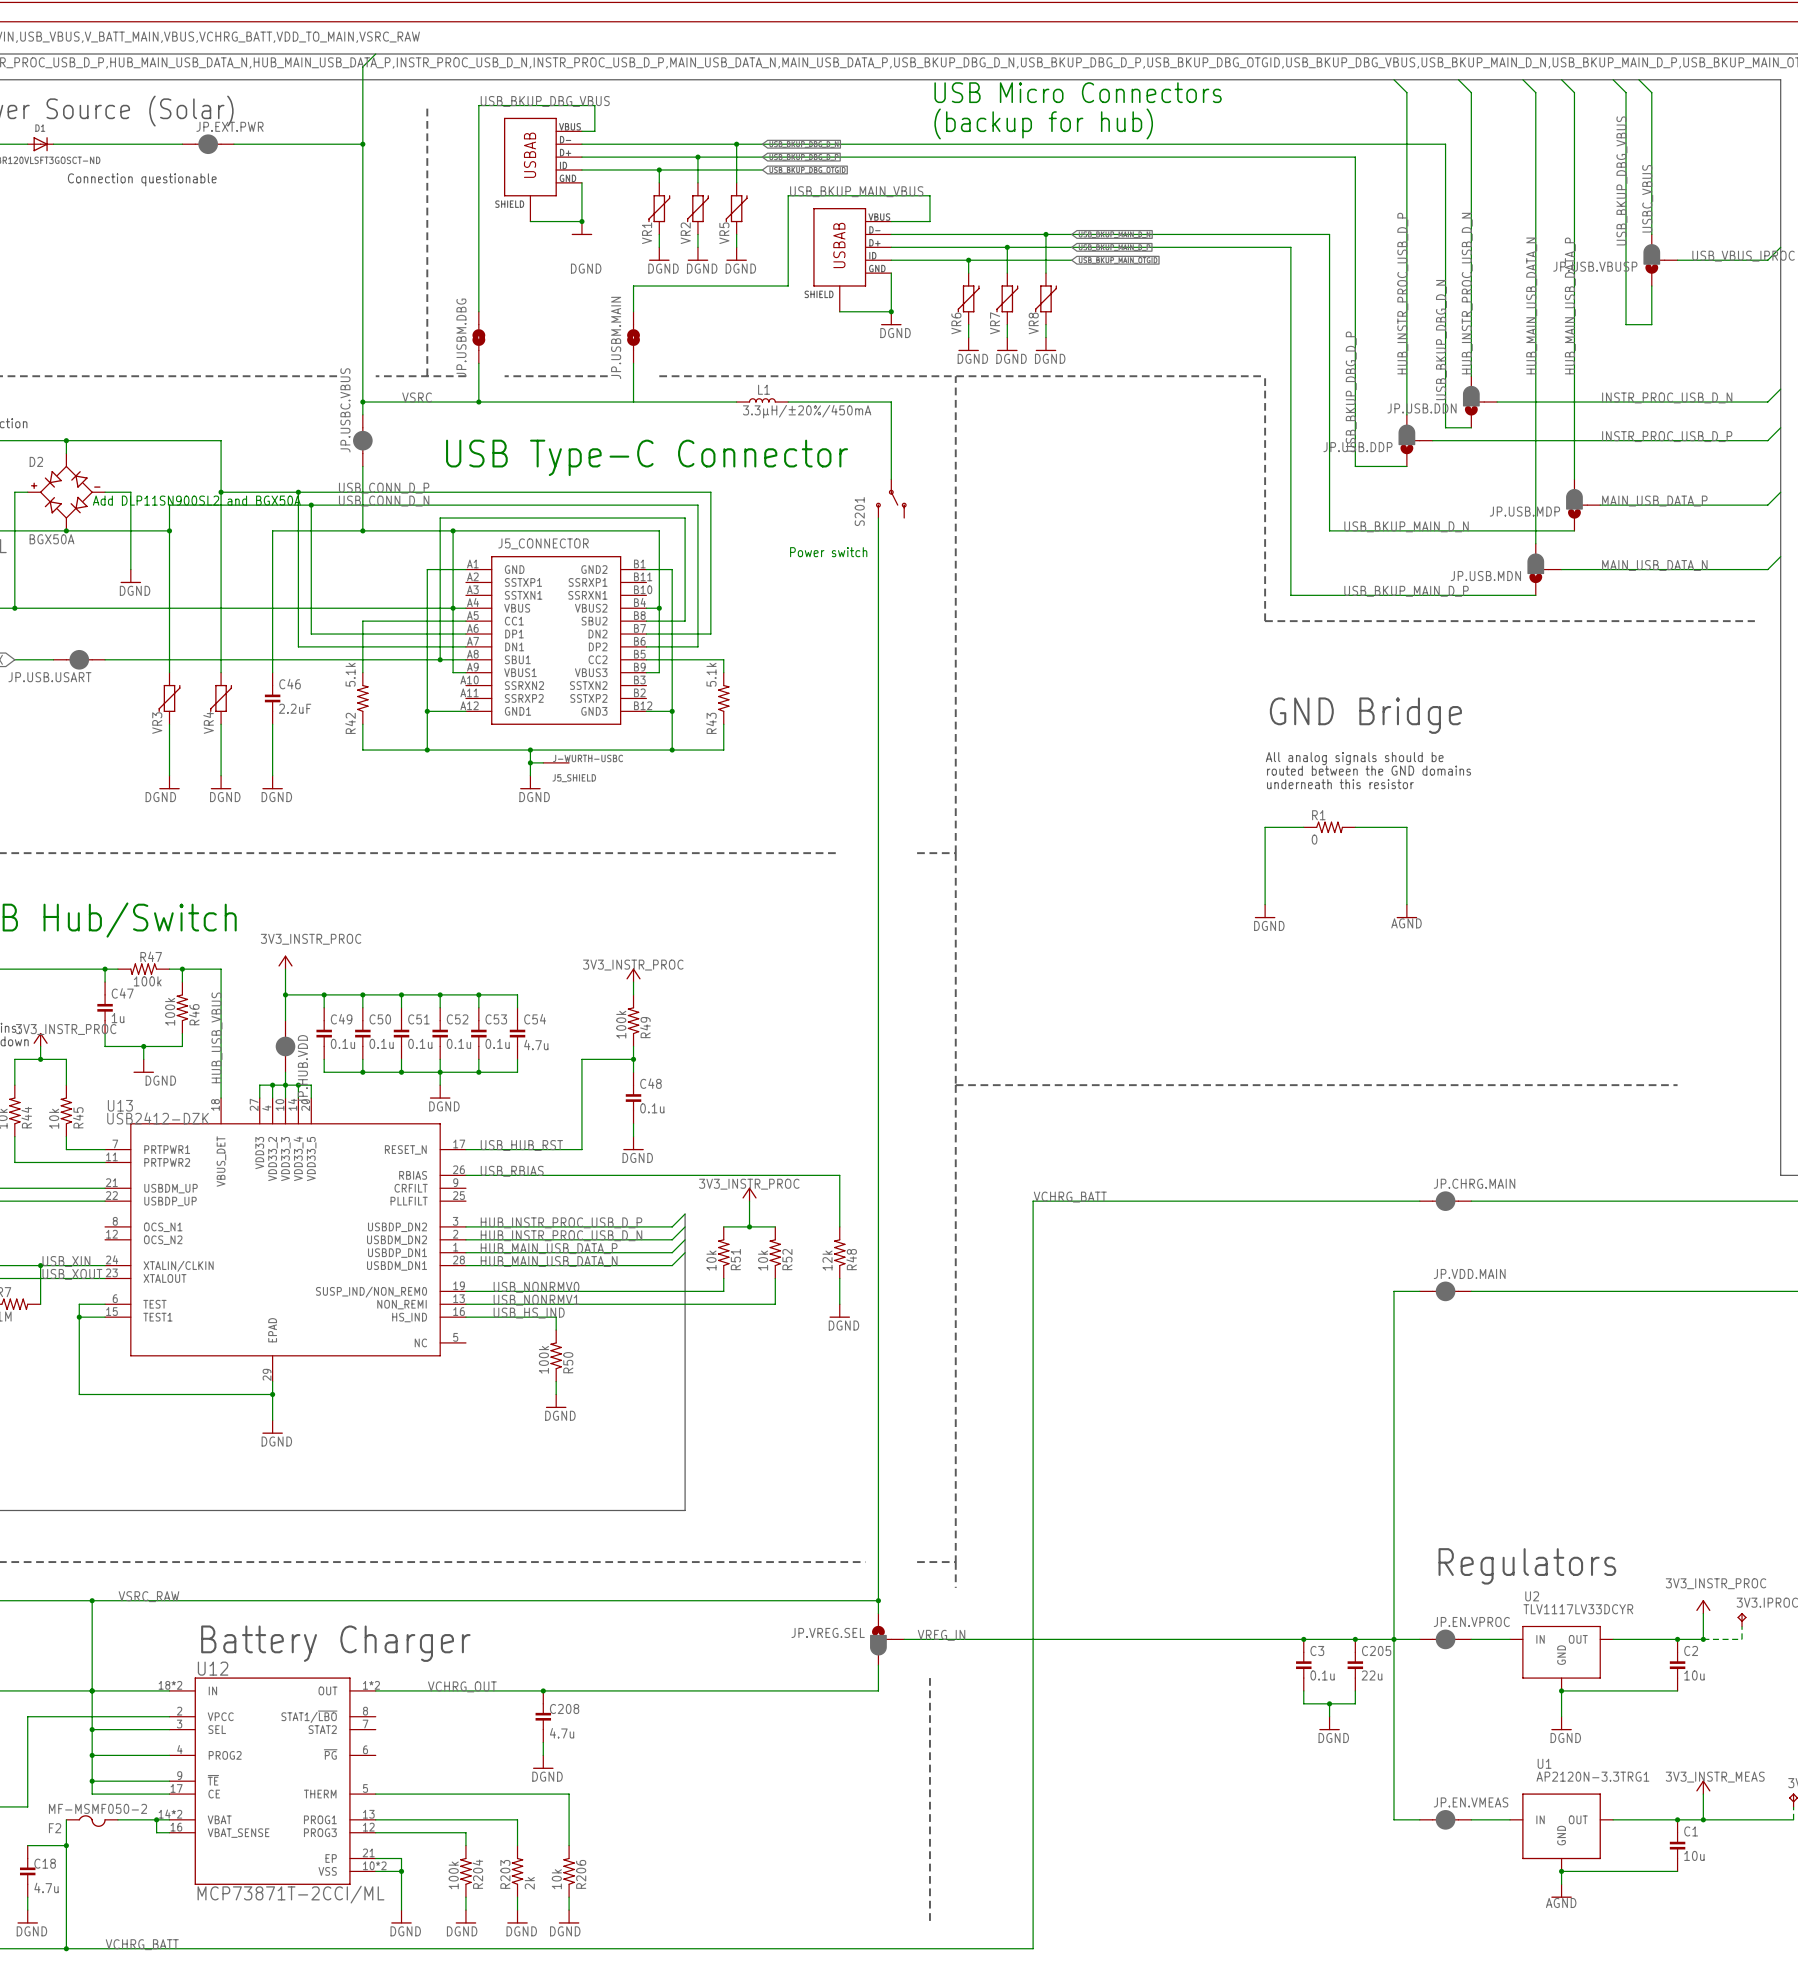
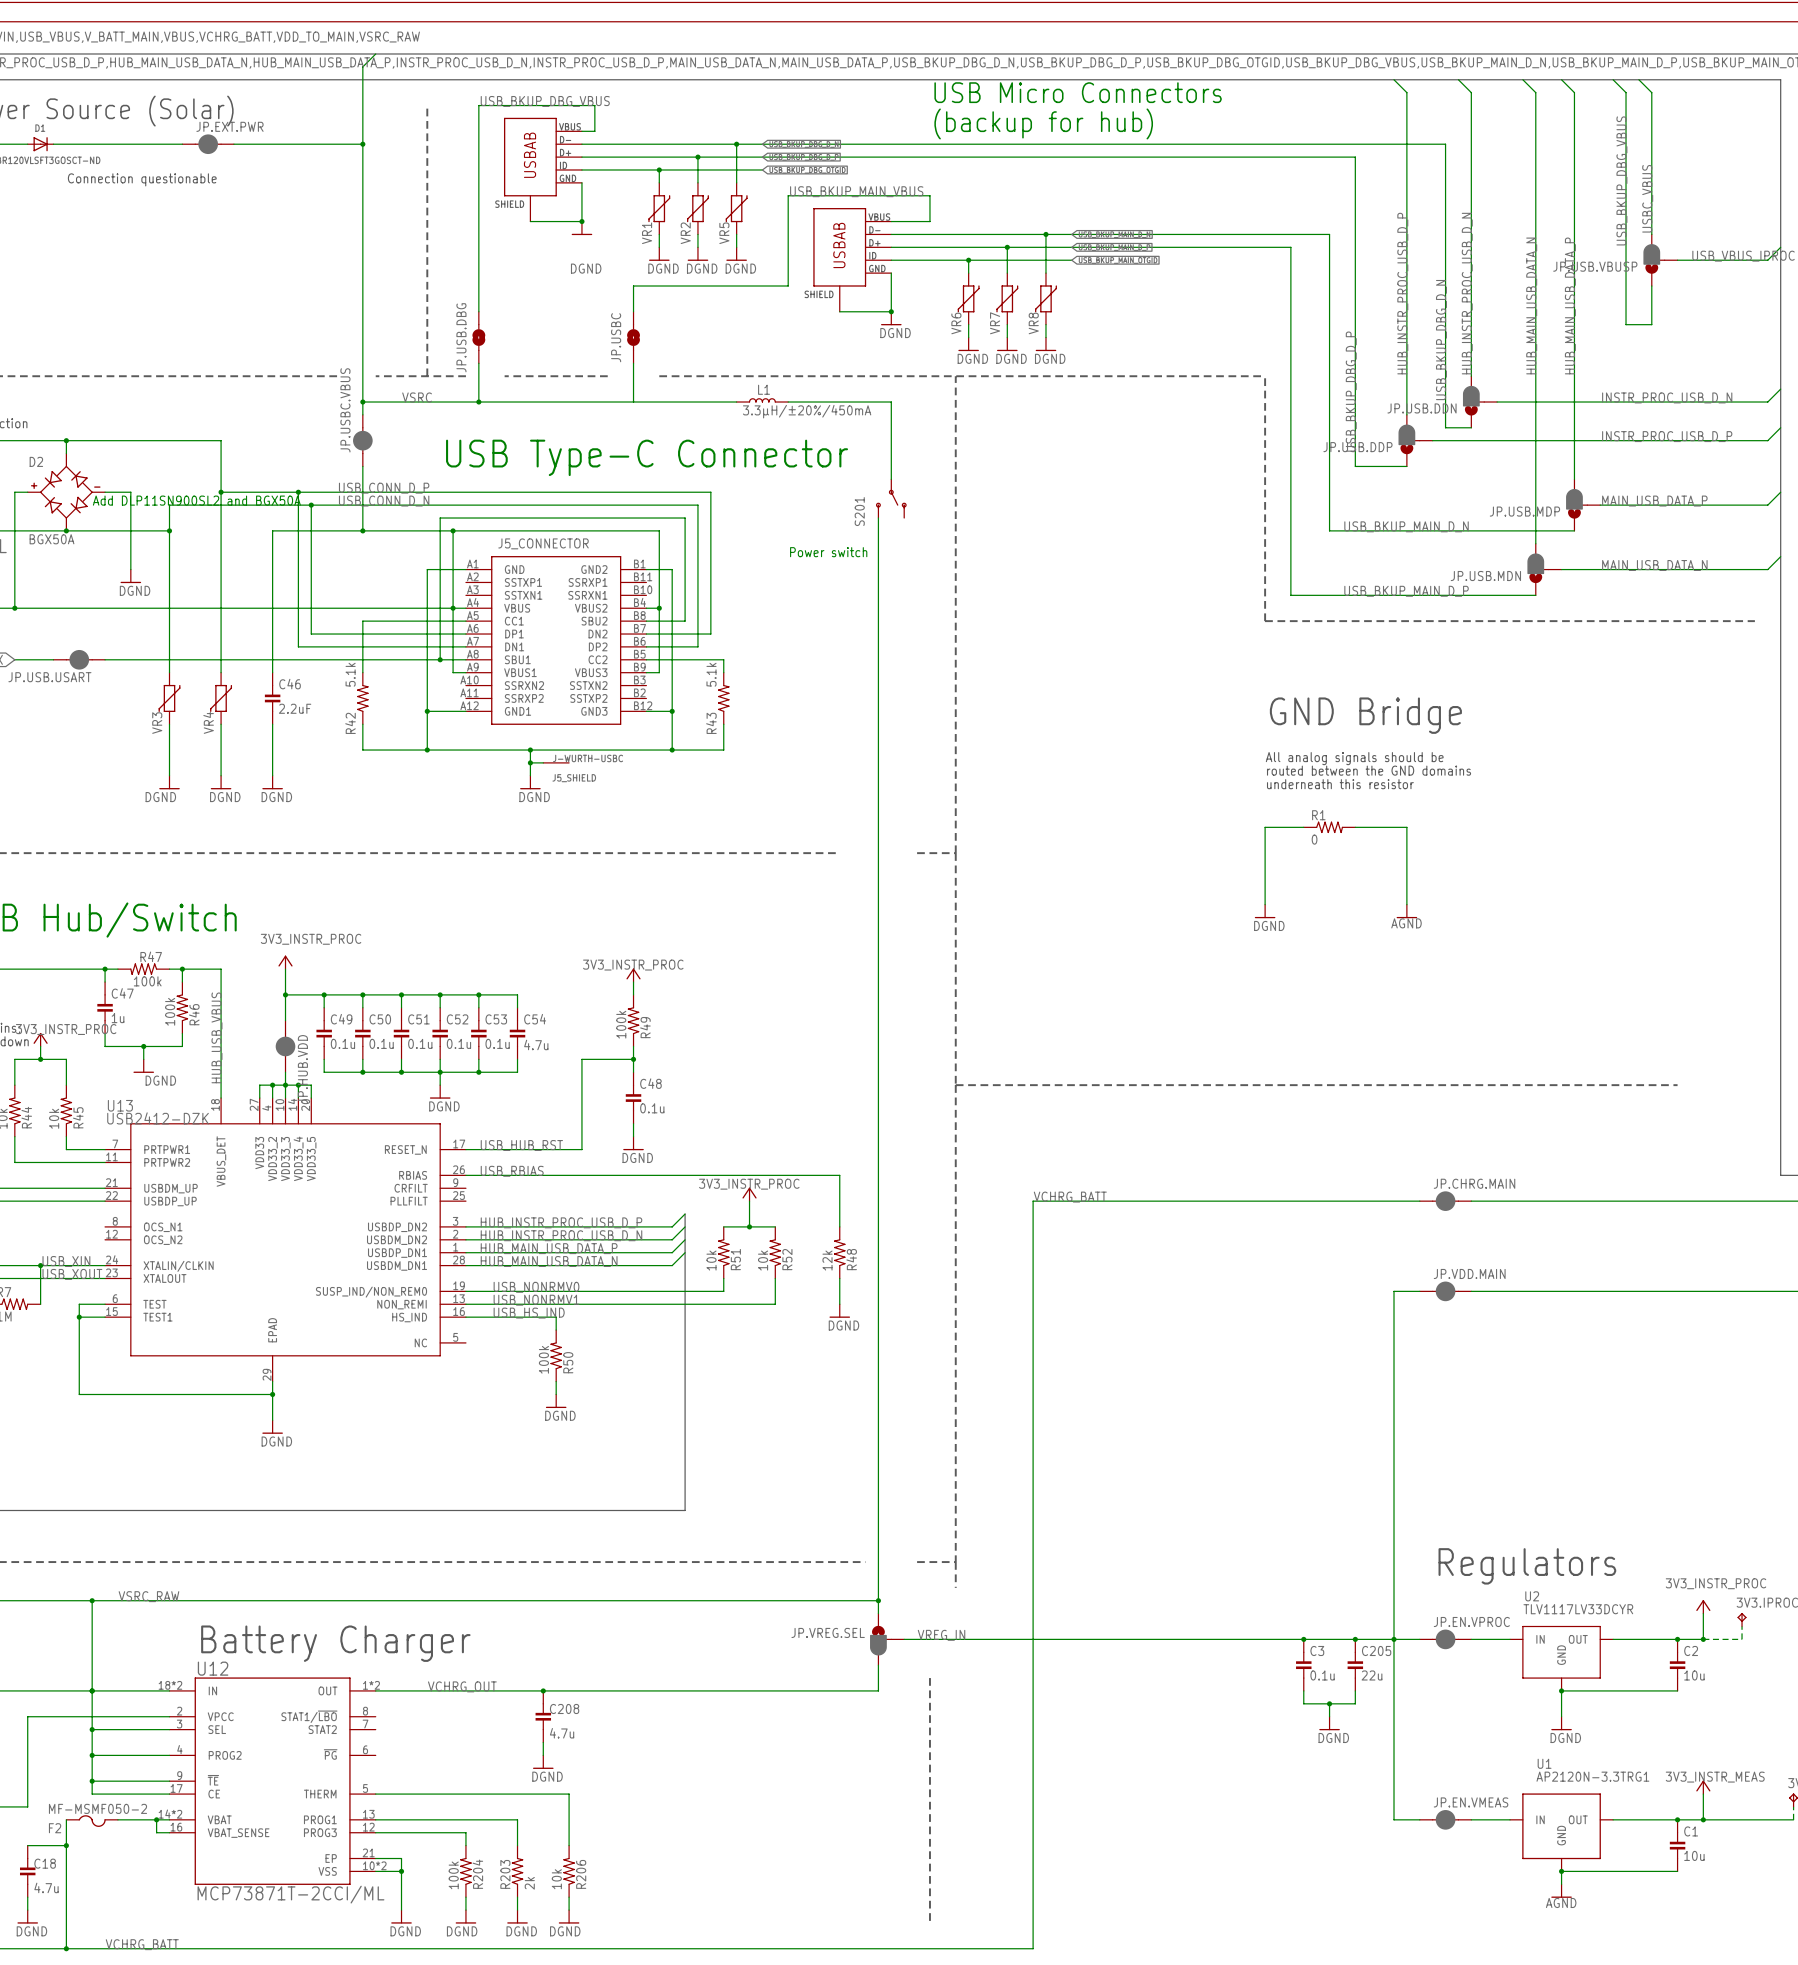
JP.USBM.DBG name: JP.USBM.DBG (461, 337) -> JP.USB.DBG (461, 337)
JP.USBM.MAIN name: JP.USBM.MAIN (616, 337) -> JP.USBC (616, 337)

